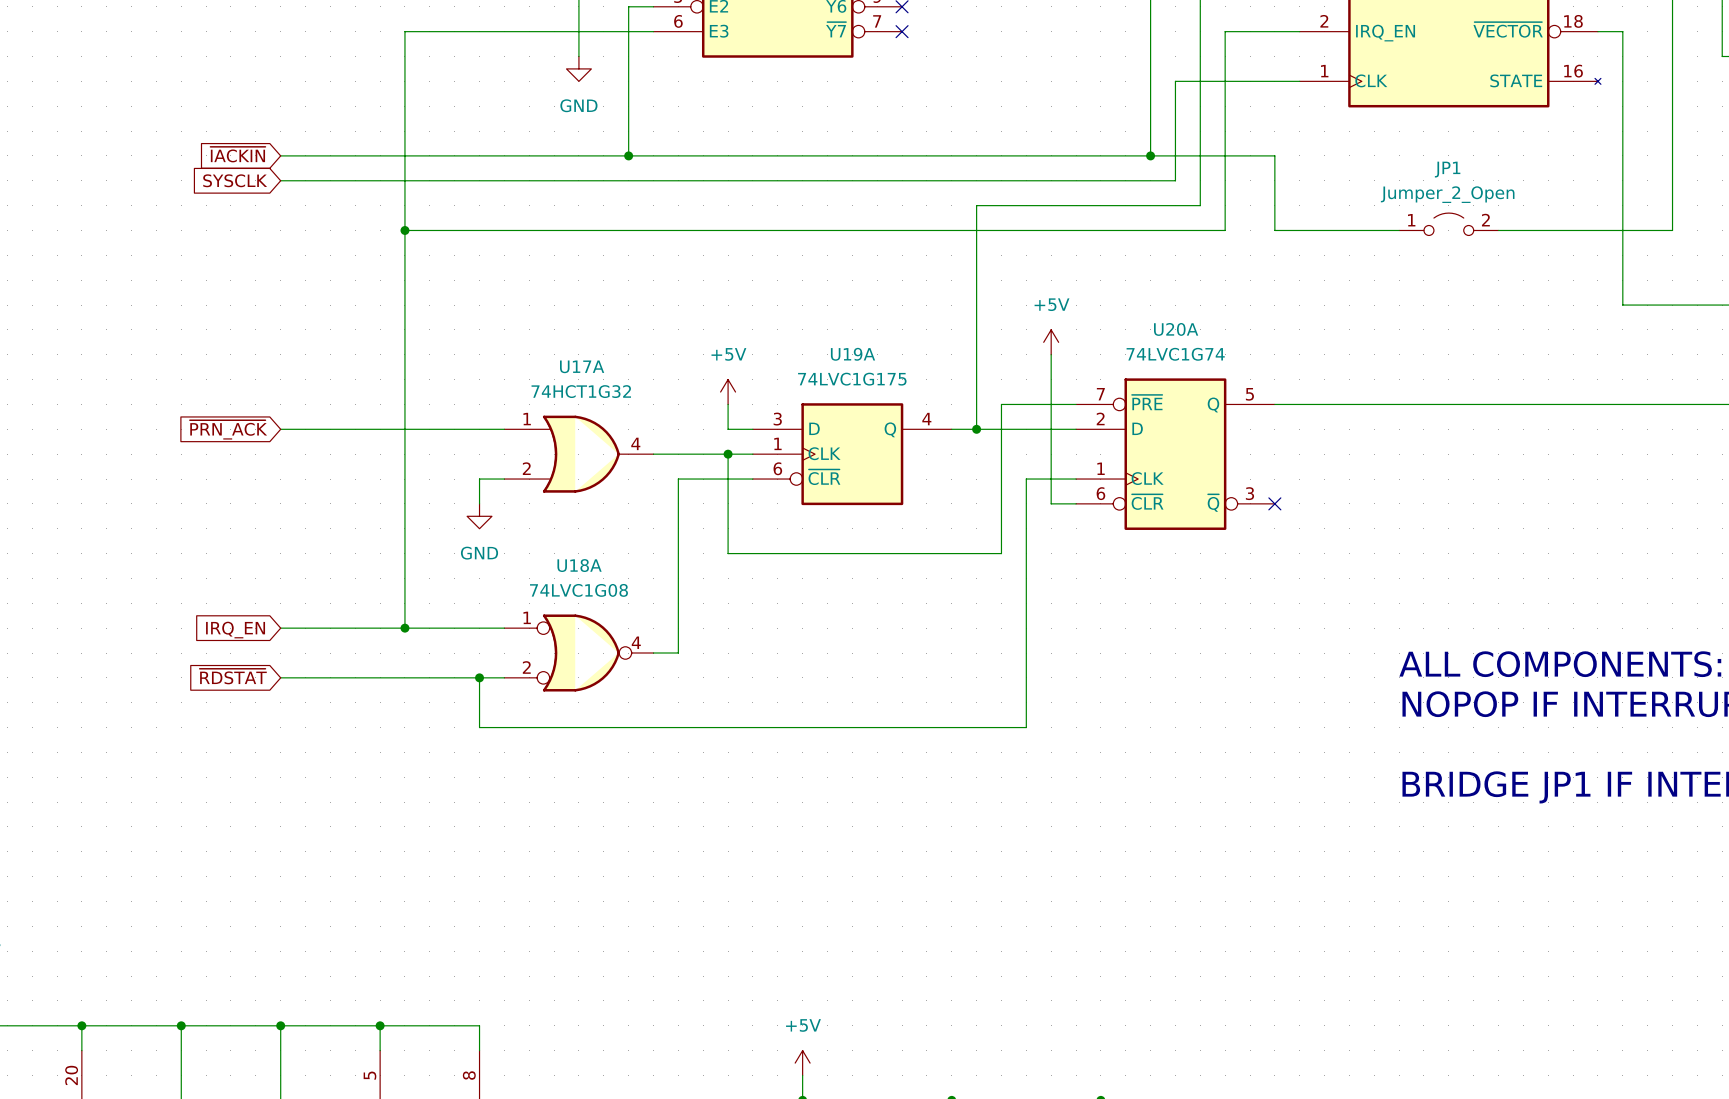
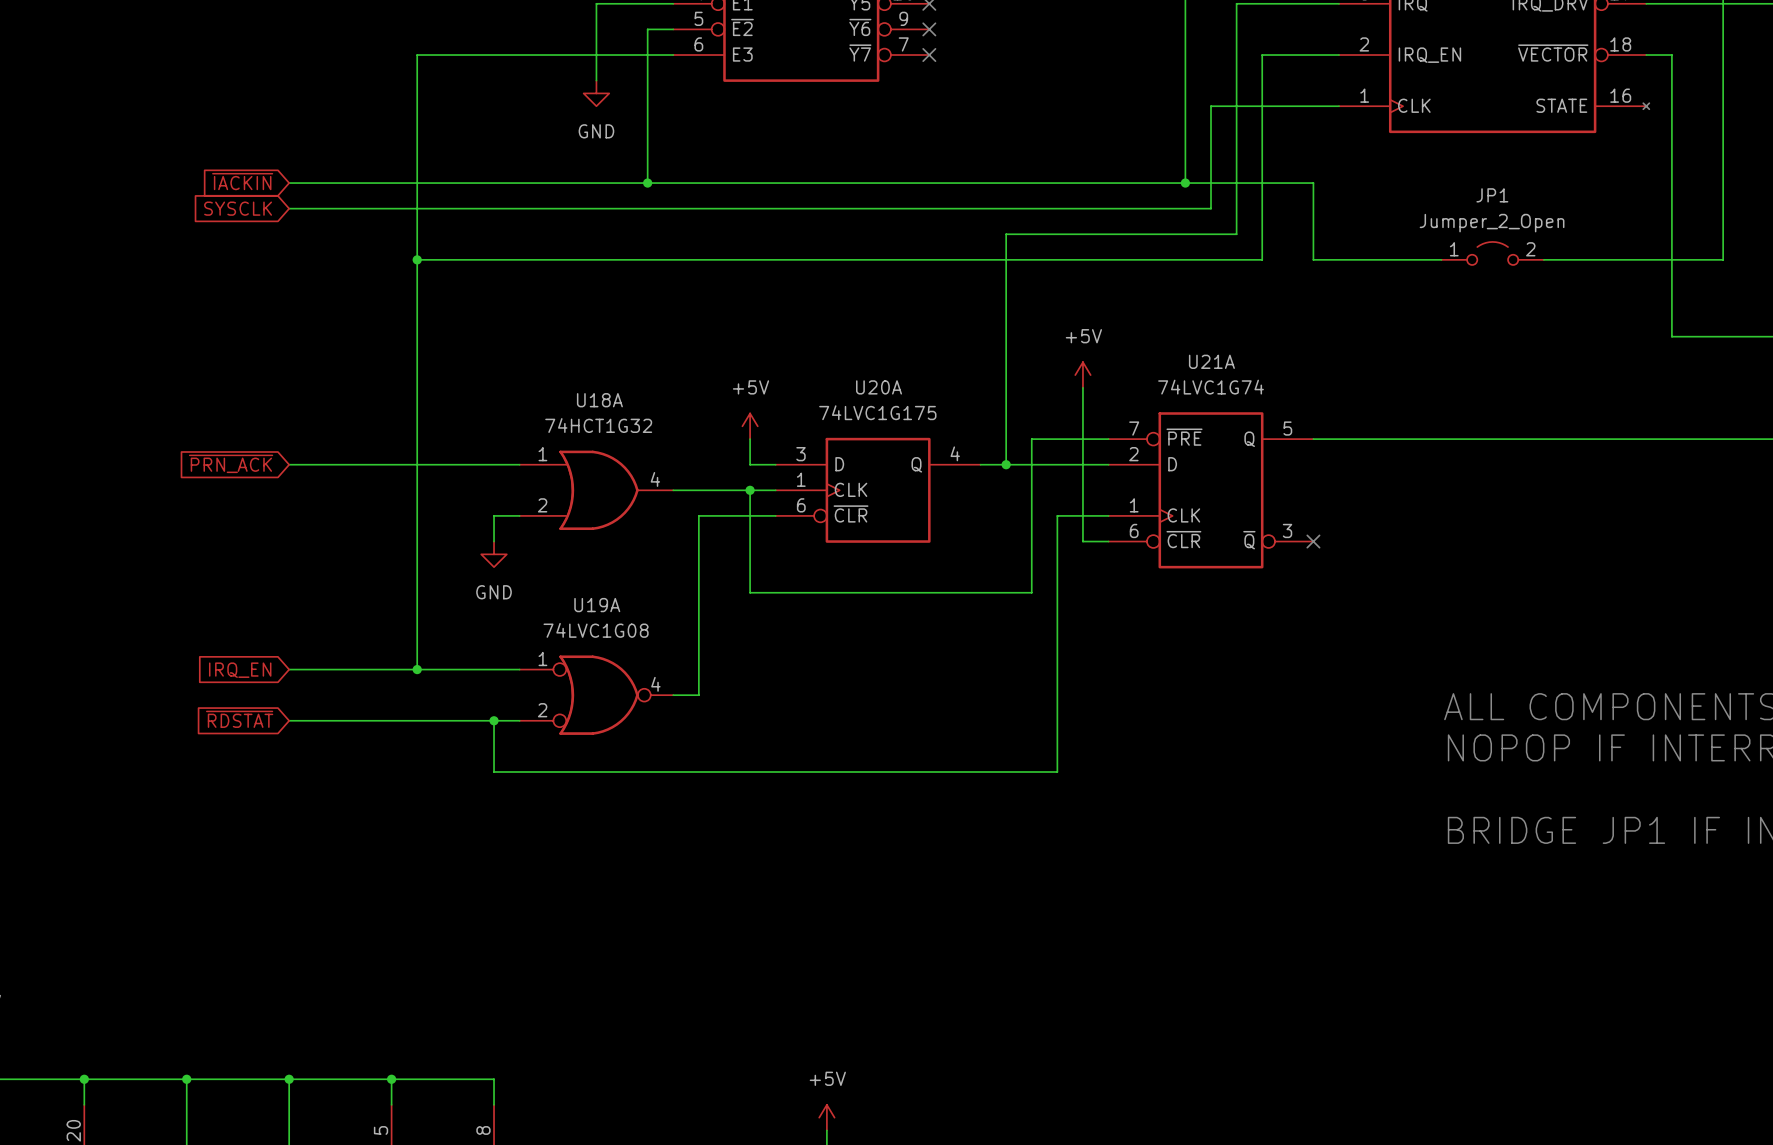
U20A name: U20A (1176, 329) -> U21A (1211, 361)
U19A name: U19A (853, 354) -> U20A (879, 387)
U17A name: U17A (582, 366) -> U18A (599, 400)
U18A name: U18A (579, 565) -> U19A (597, 605)

